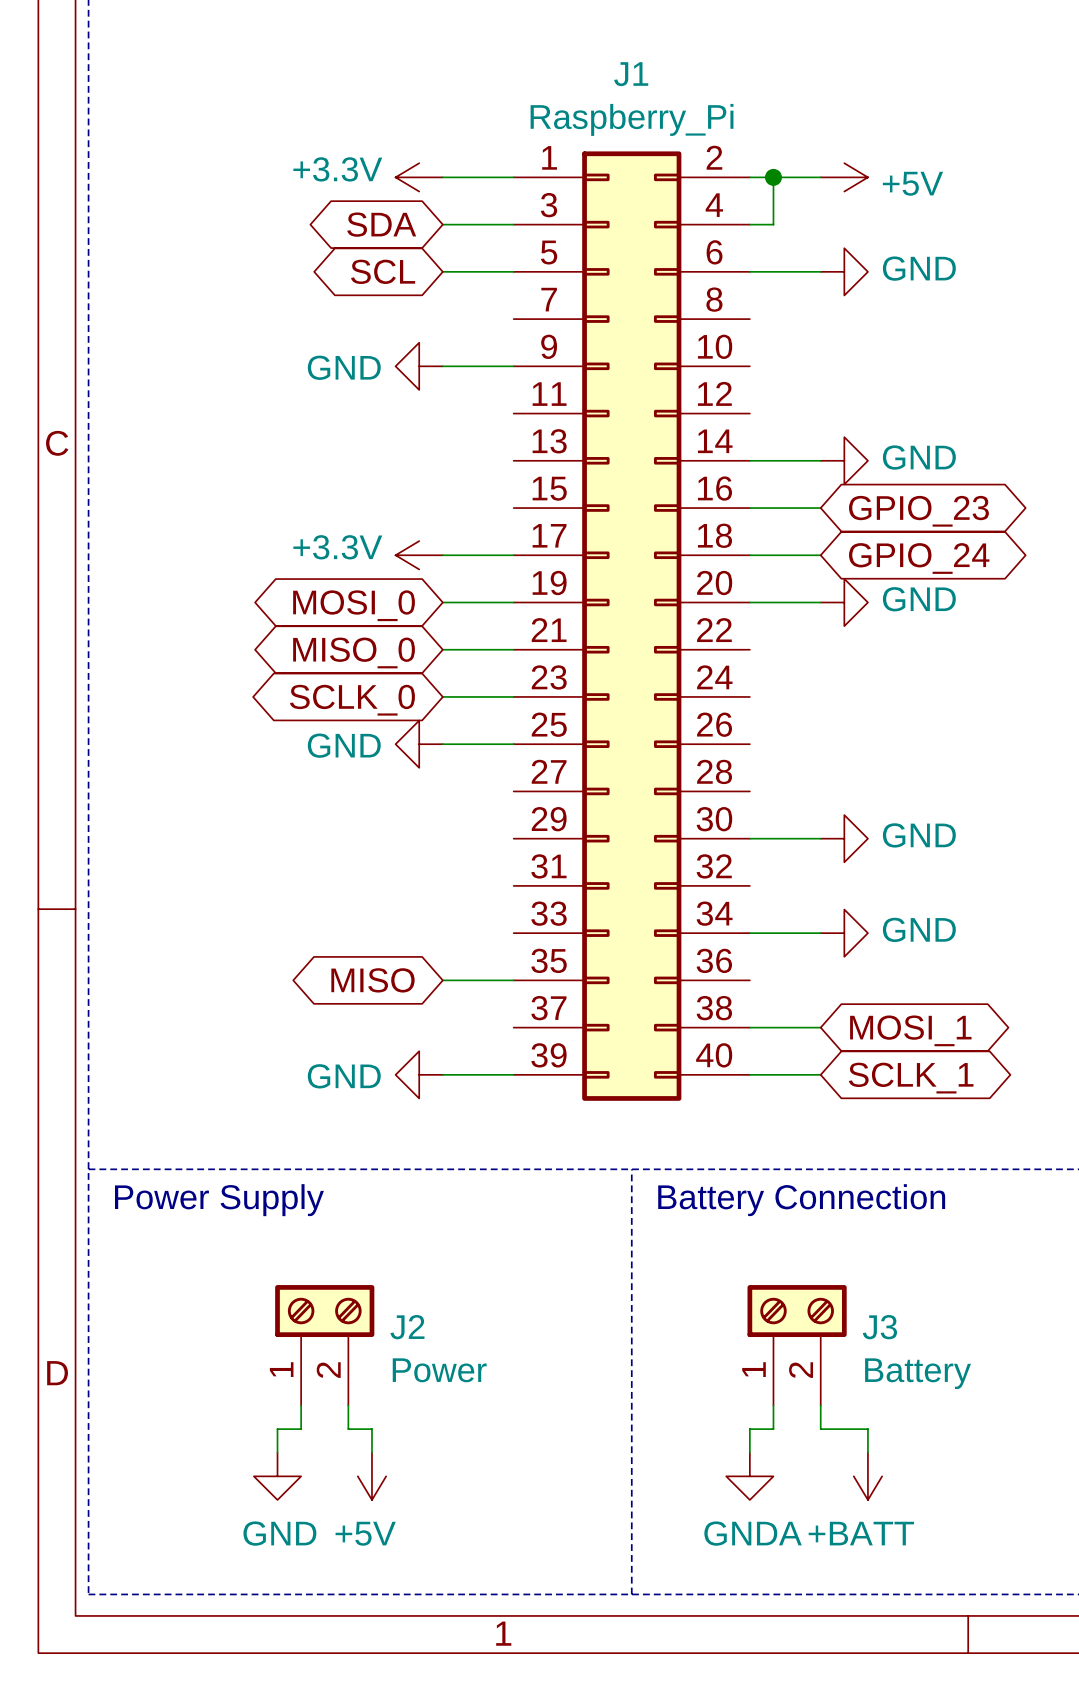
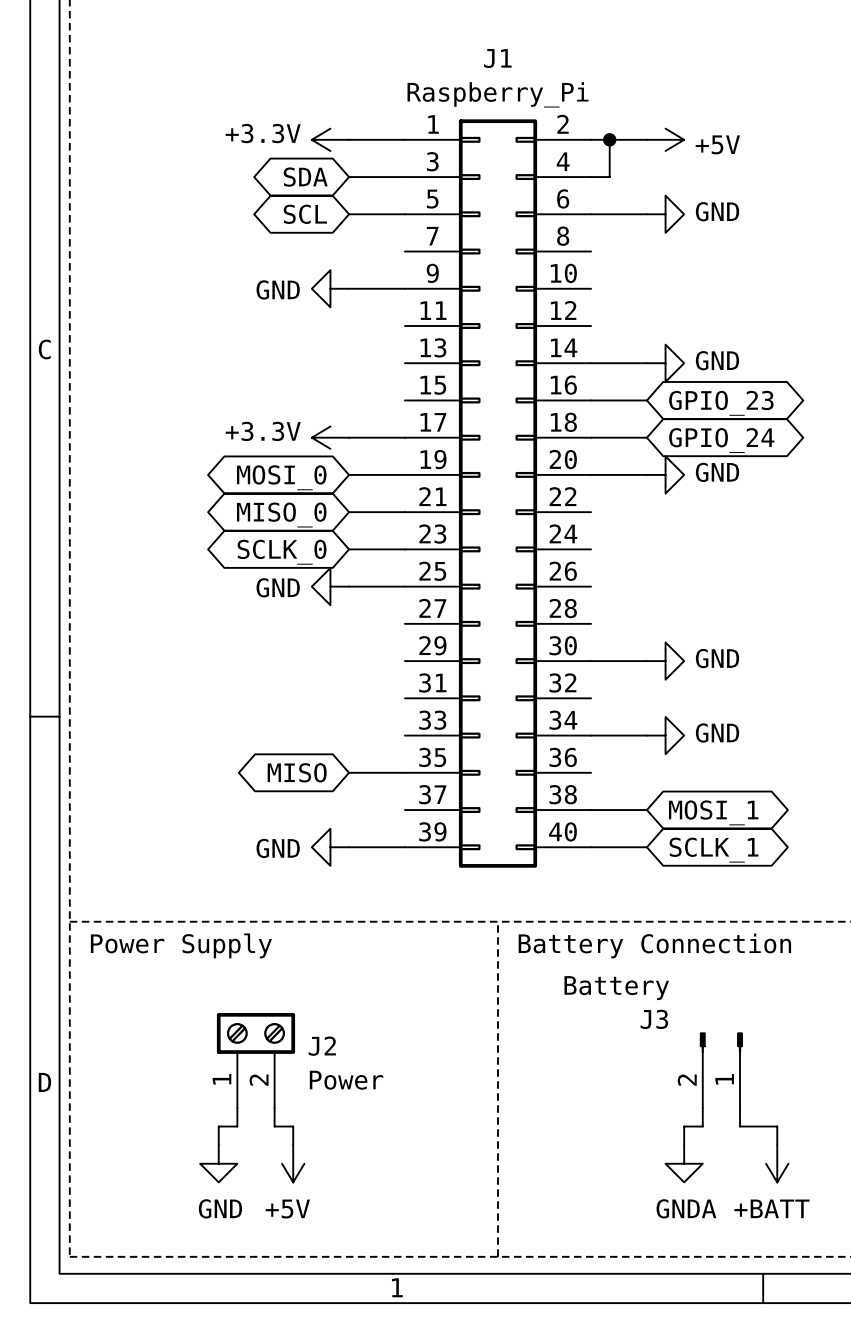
J3 symbol: [747, 1285, 847, 1406] -> [699, 1032, 744, 1108]
J3 name position: J3 (879, 1327) -> J3 (654, 1019)
J3 value position: Battery (918, 1373) -> Battery (616, 988)
wire: (773, 1405) (773, 1429) (749, 1429) (749, 1452) -> none
wire: (820, 1405) (820, 1429) (867, 1429) -> (702, 1107) (702, 1126) (684, 1126)
wire: none -> (740, 1107) (740, 1126) (777, 1126) (777, 1145)
power symbol: GNDA (749, 1476) -> none
power symbol: +BATT (867, 1476) -> GNDA (684, 1163)
power symbol: none -> +BATT (777, 1163)

